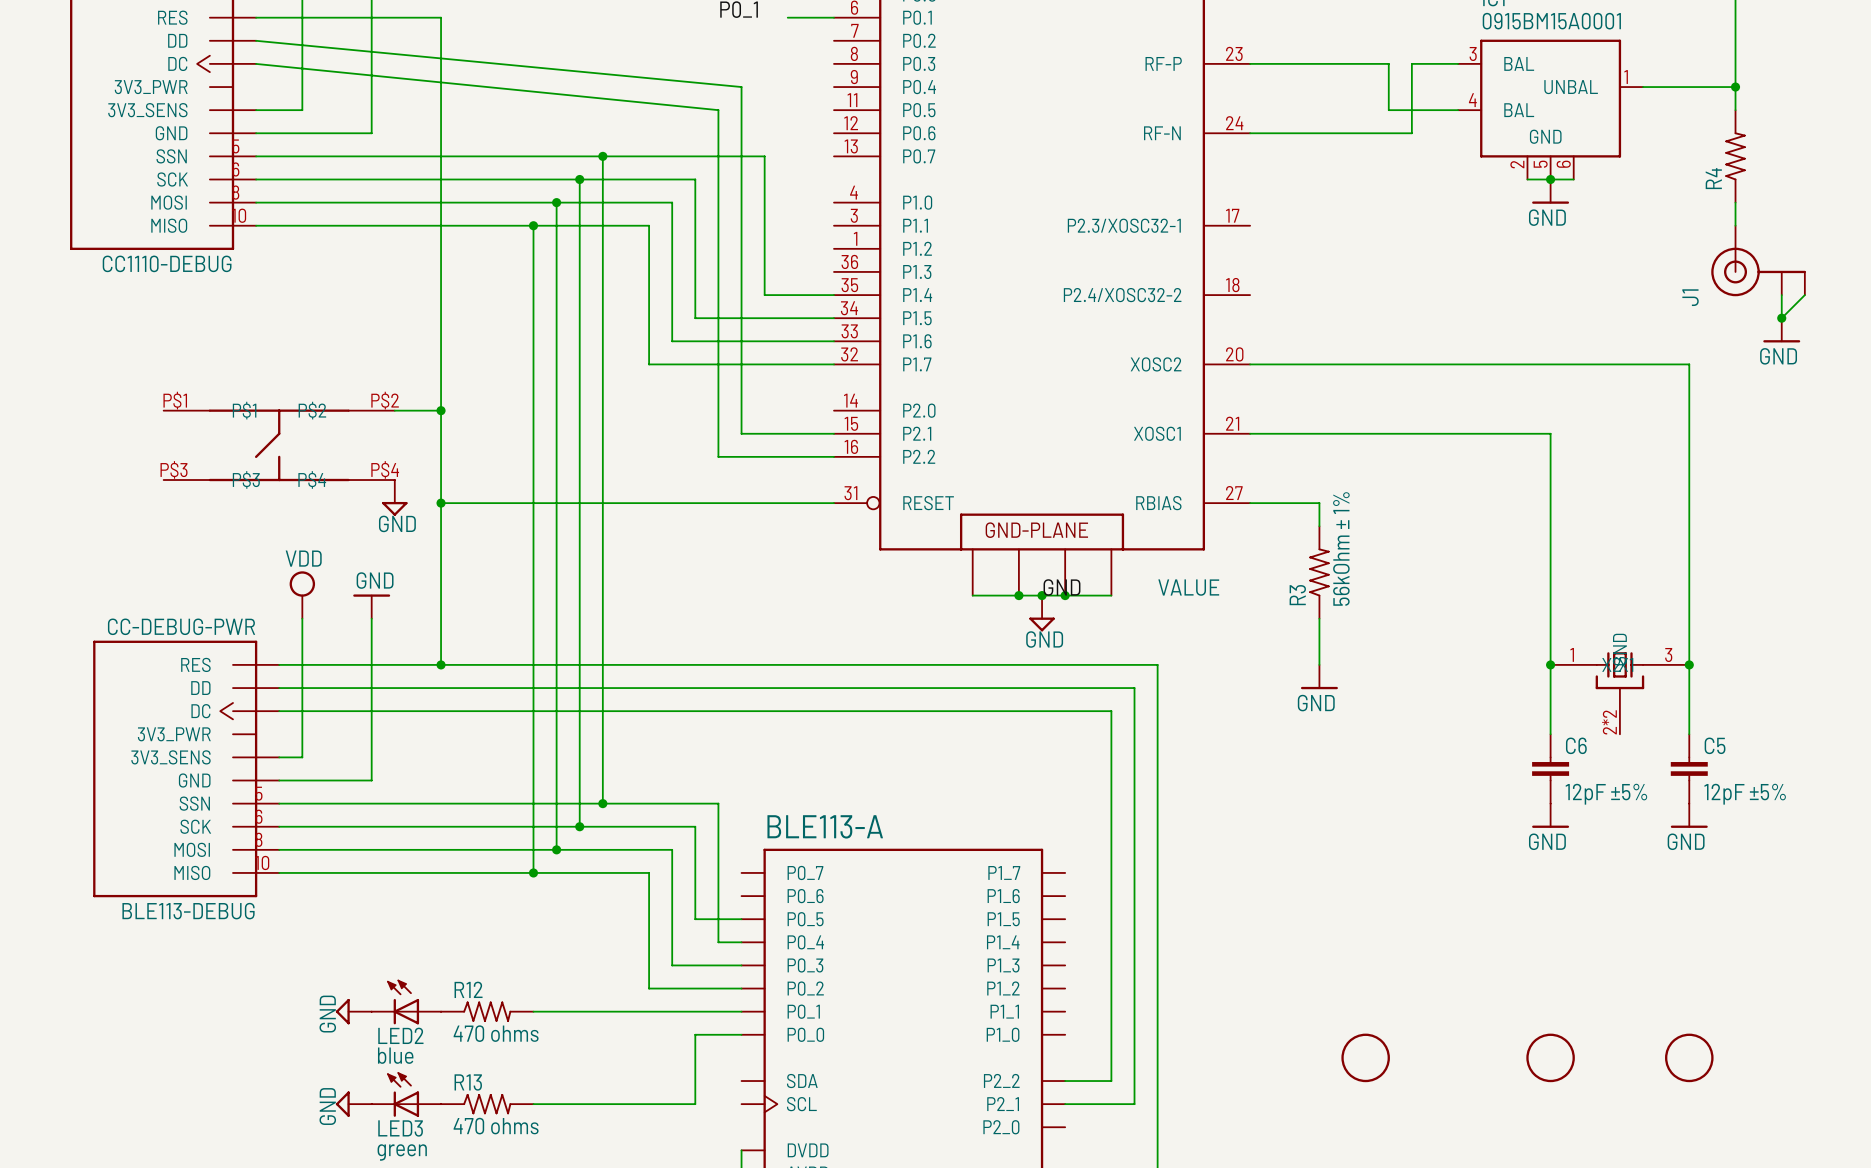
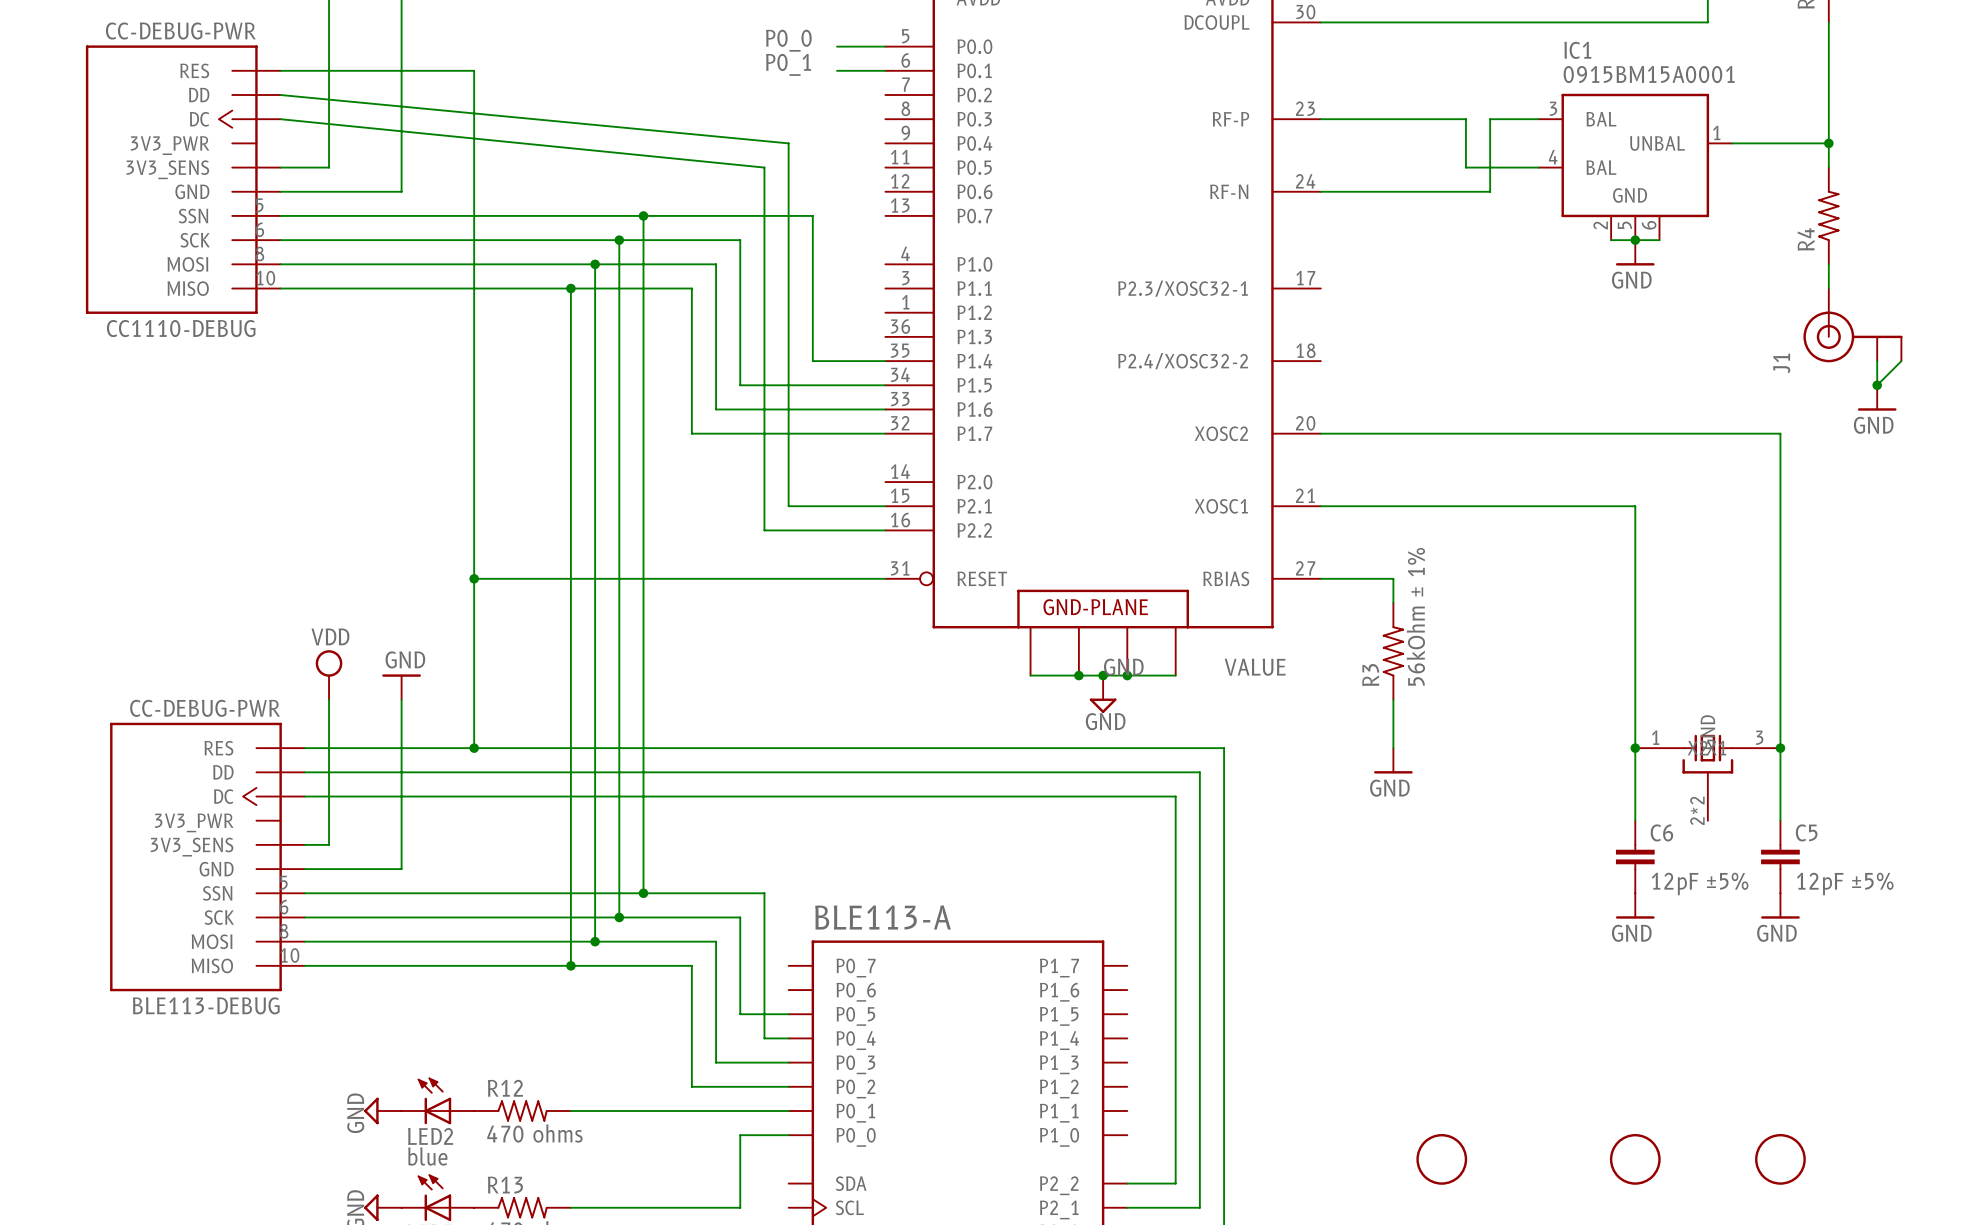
wire: (394, 410) (441, 410) -> none
junction: (441, 410) -> none
part: (279, 445) -> none
power symbol: GND (394, 497) -> none

